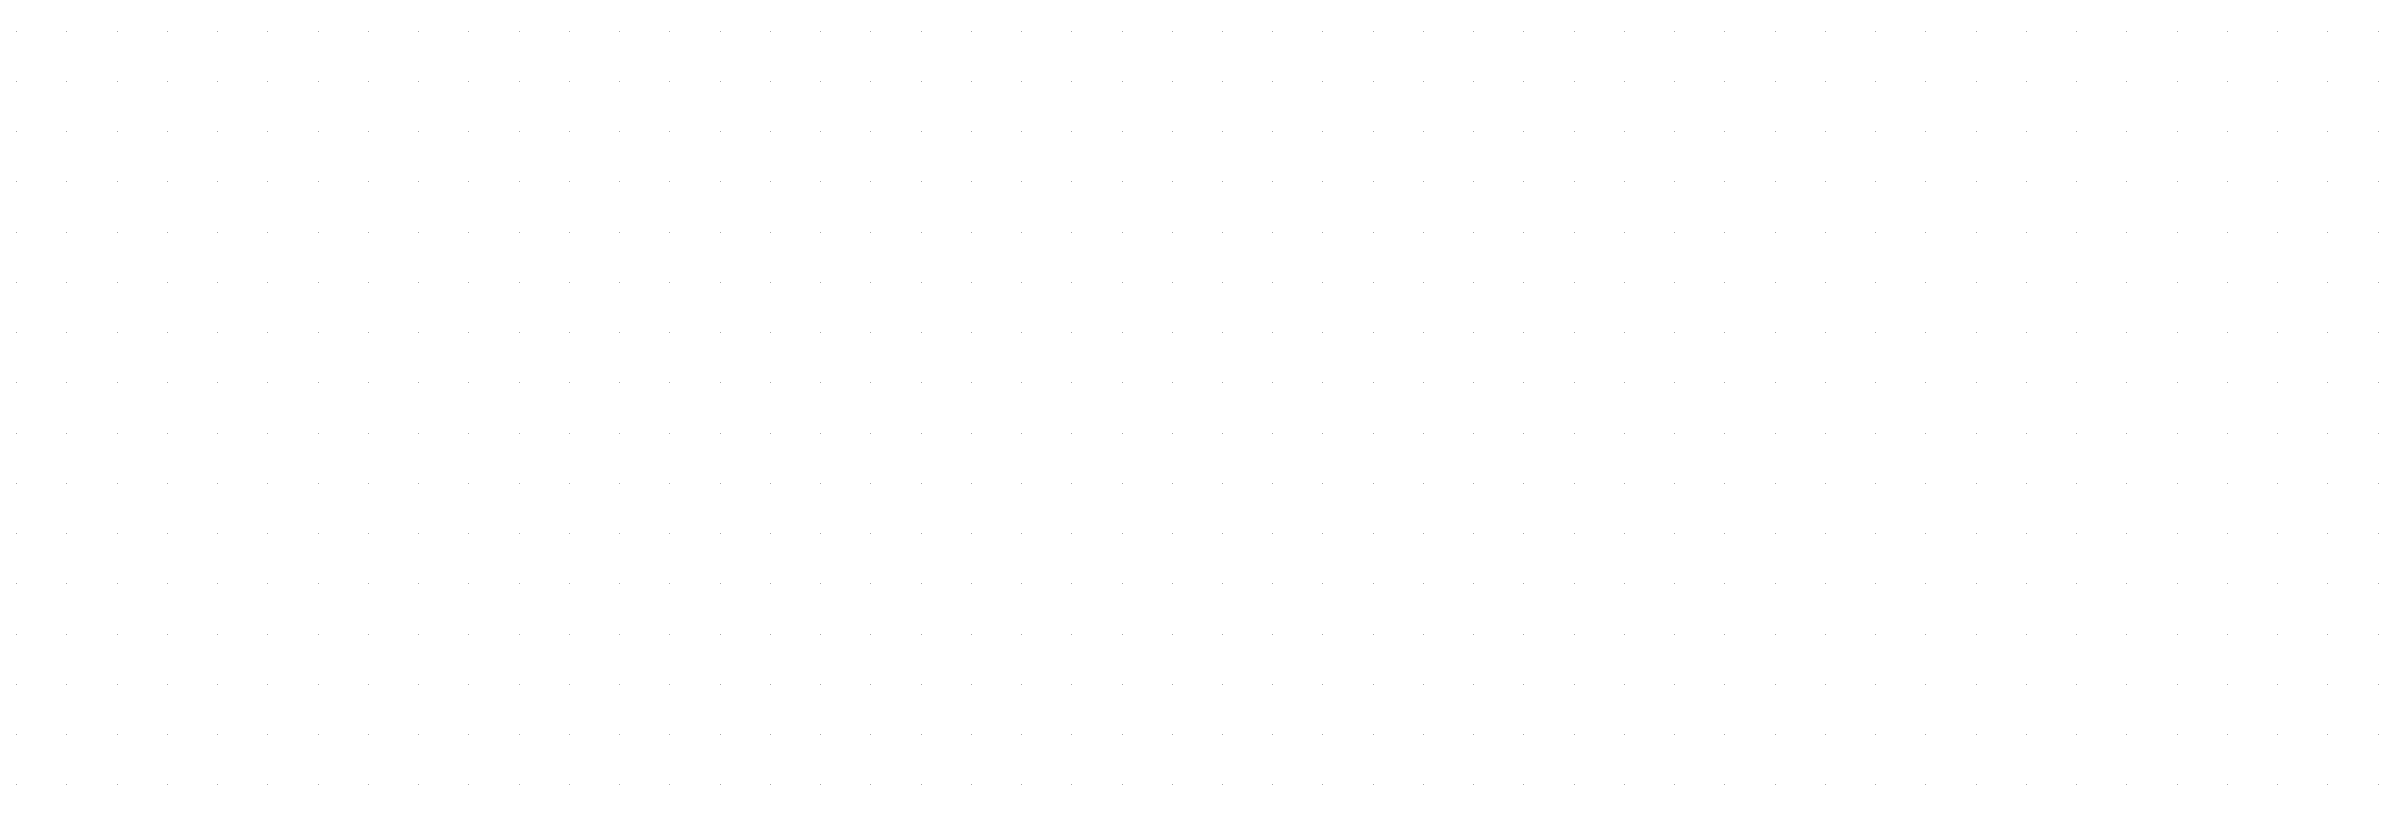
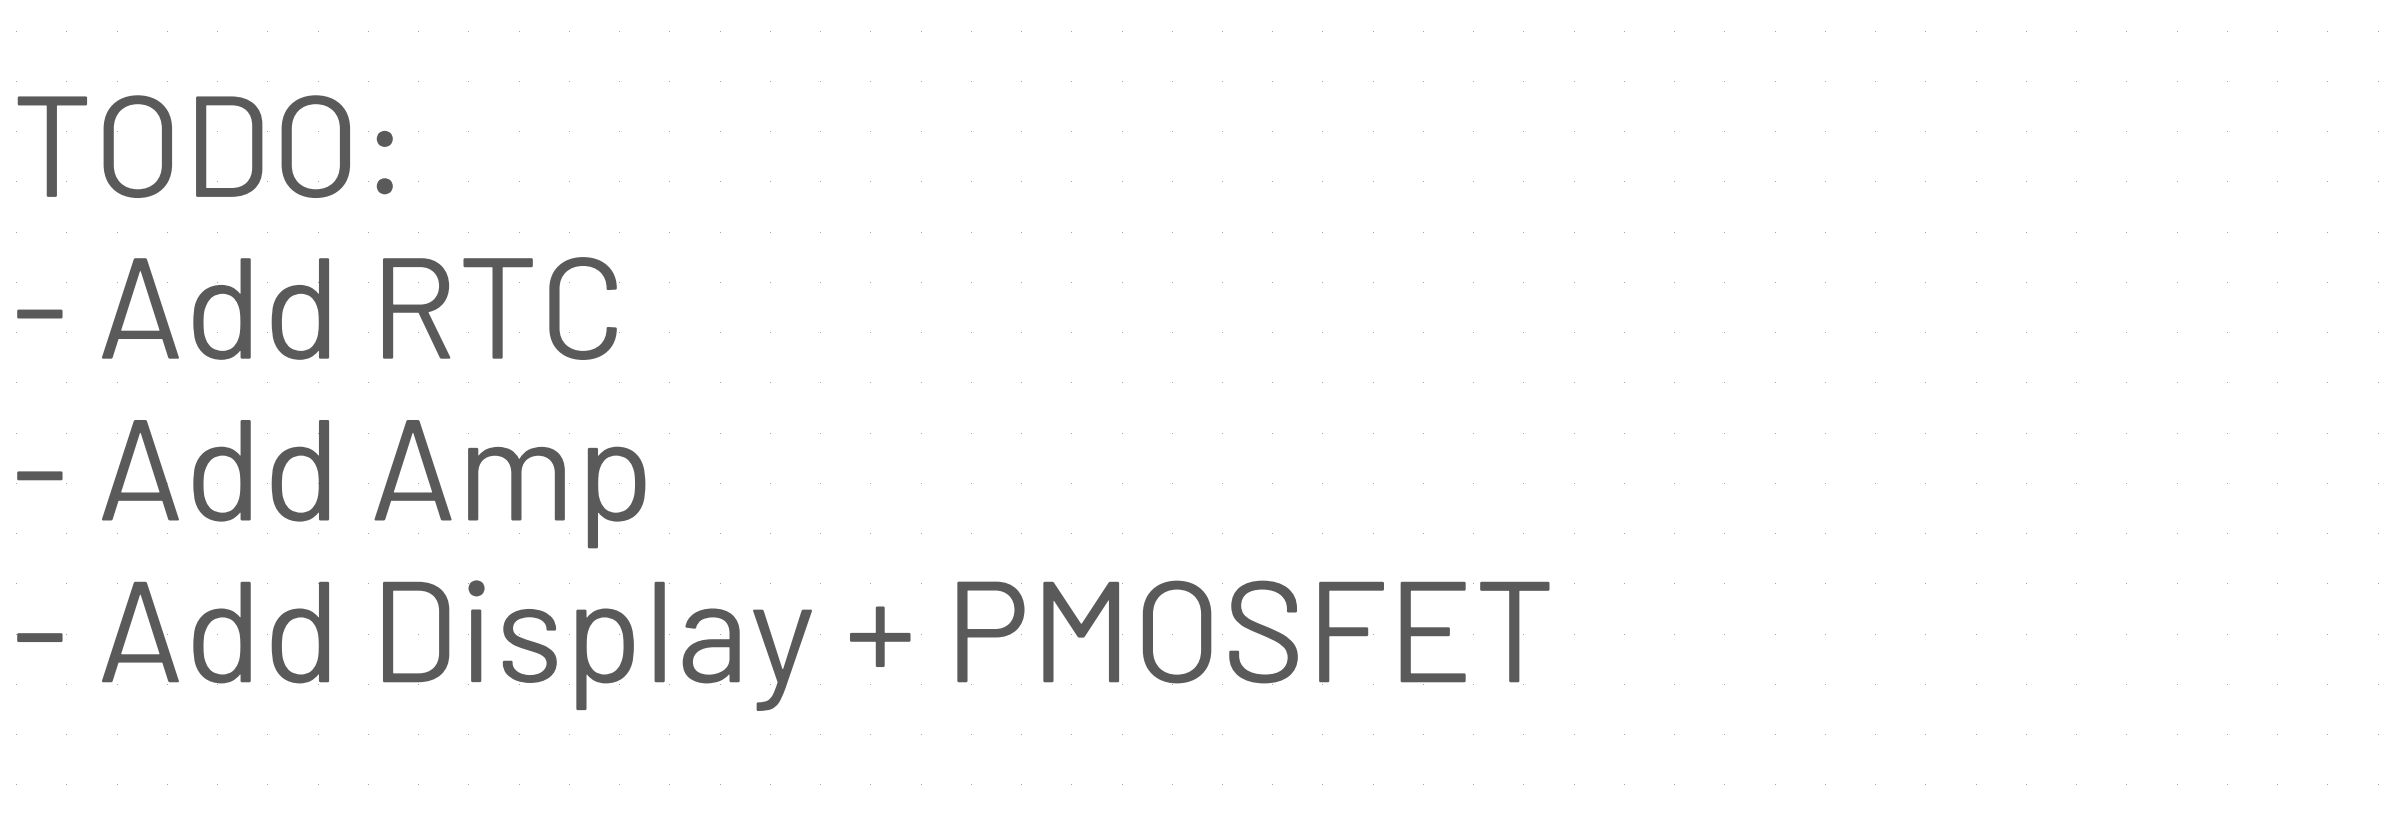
text: none -> TODO: (205, 146)
text: none -> - Add RTC (317, 308)
text: none -> - Add Amp (331, 484)
text: none -> - Add Display + PMOSFET (783, 645)

